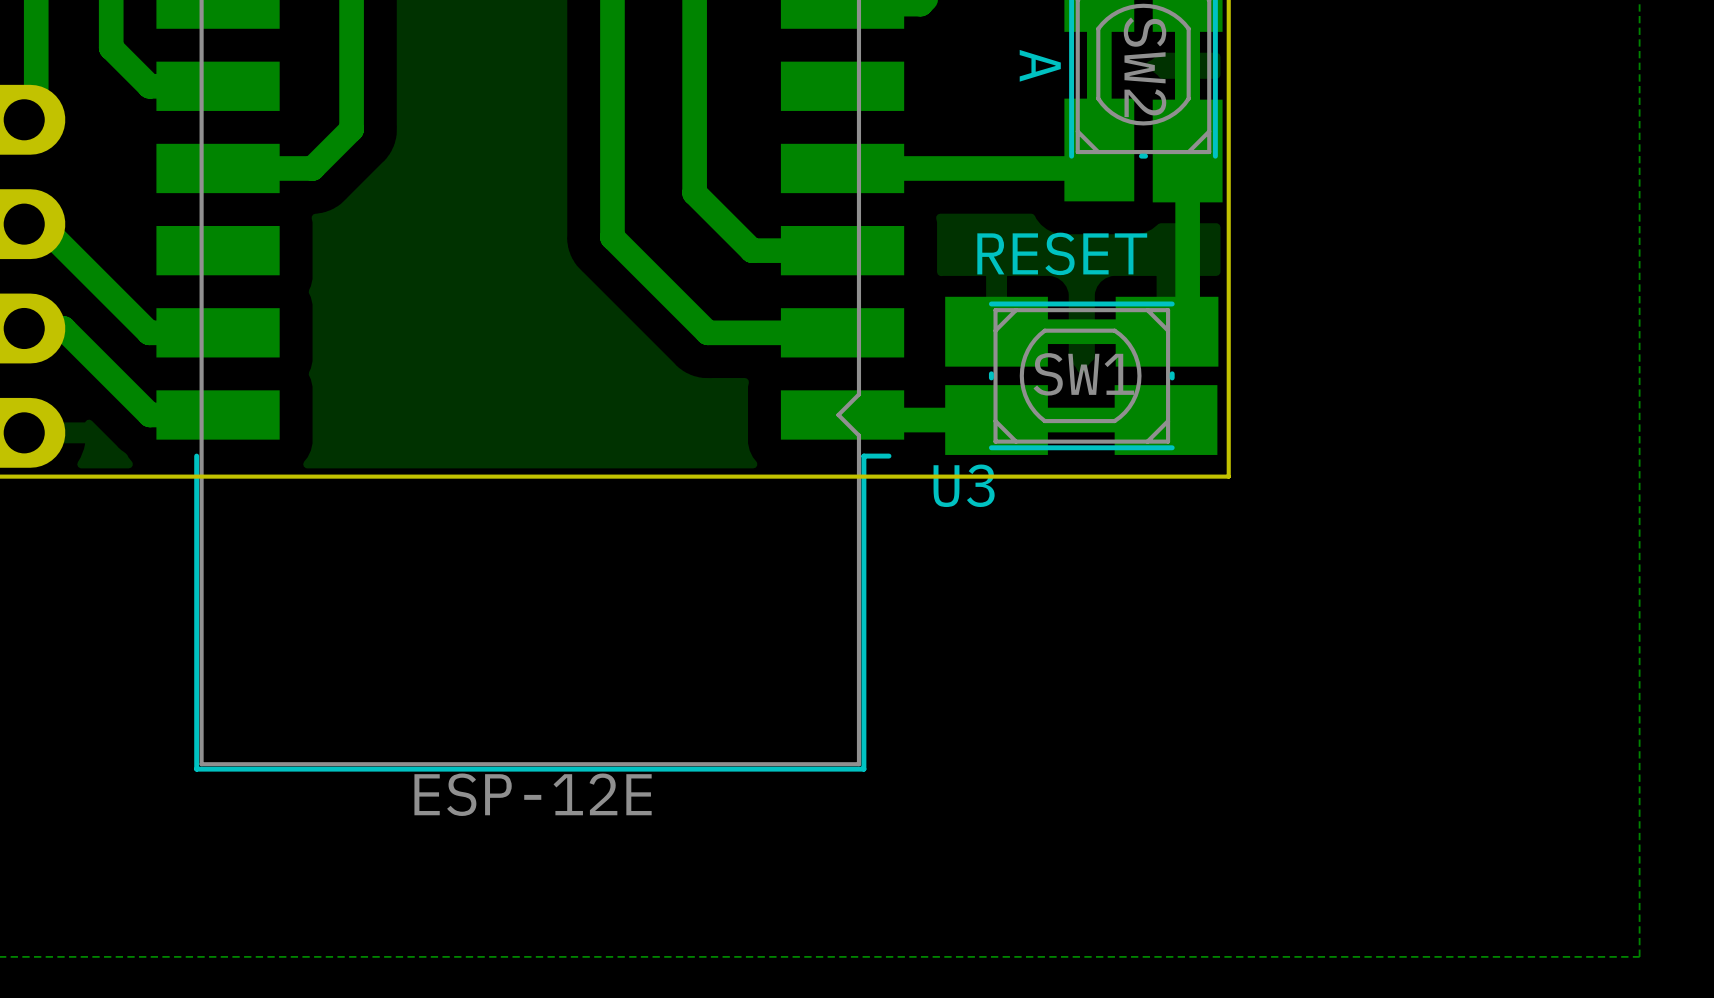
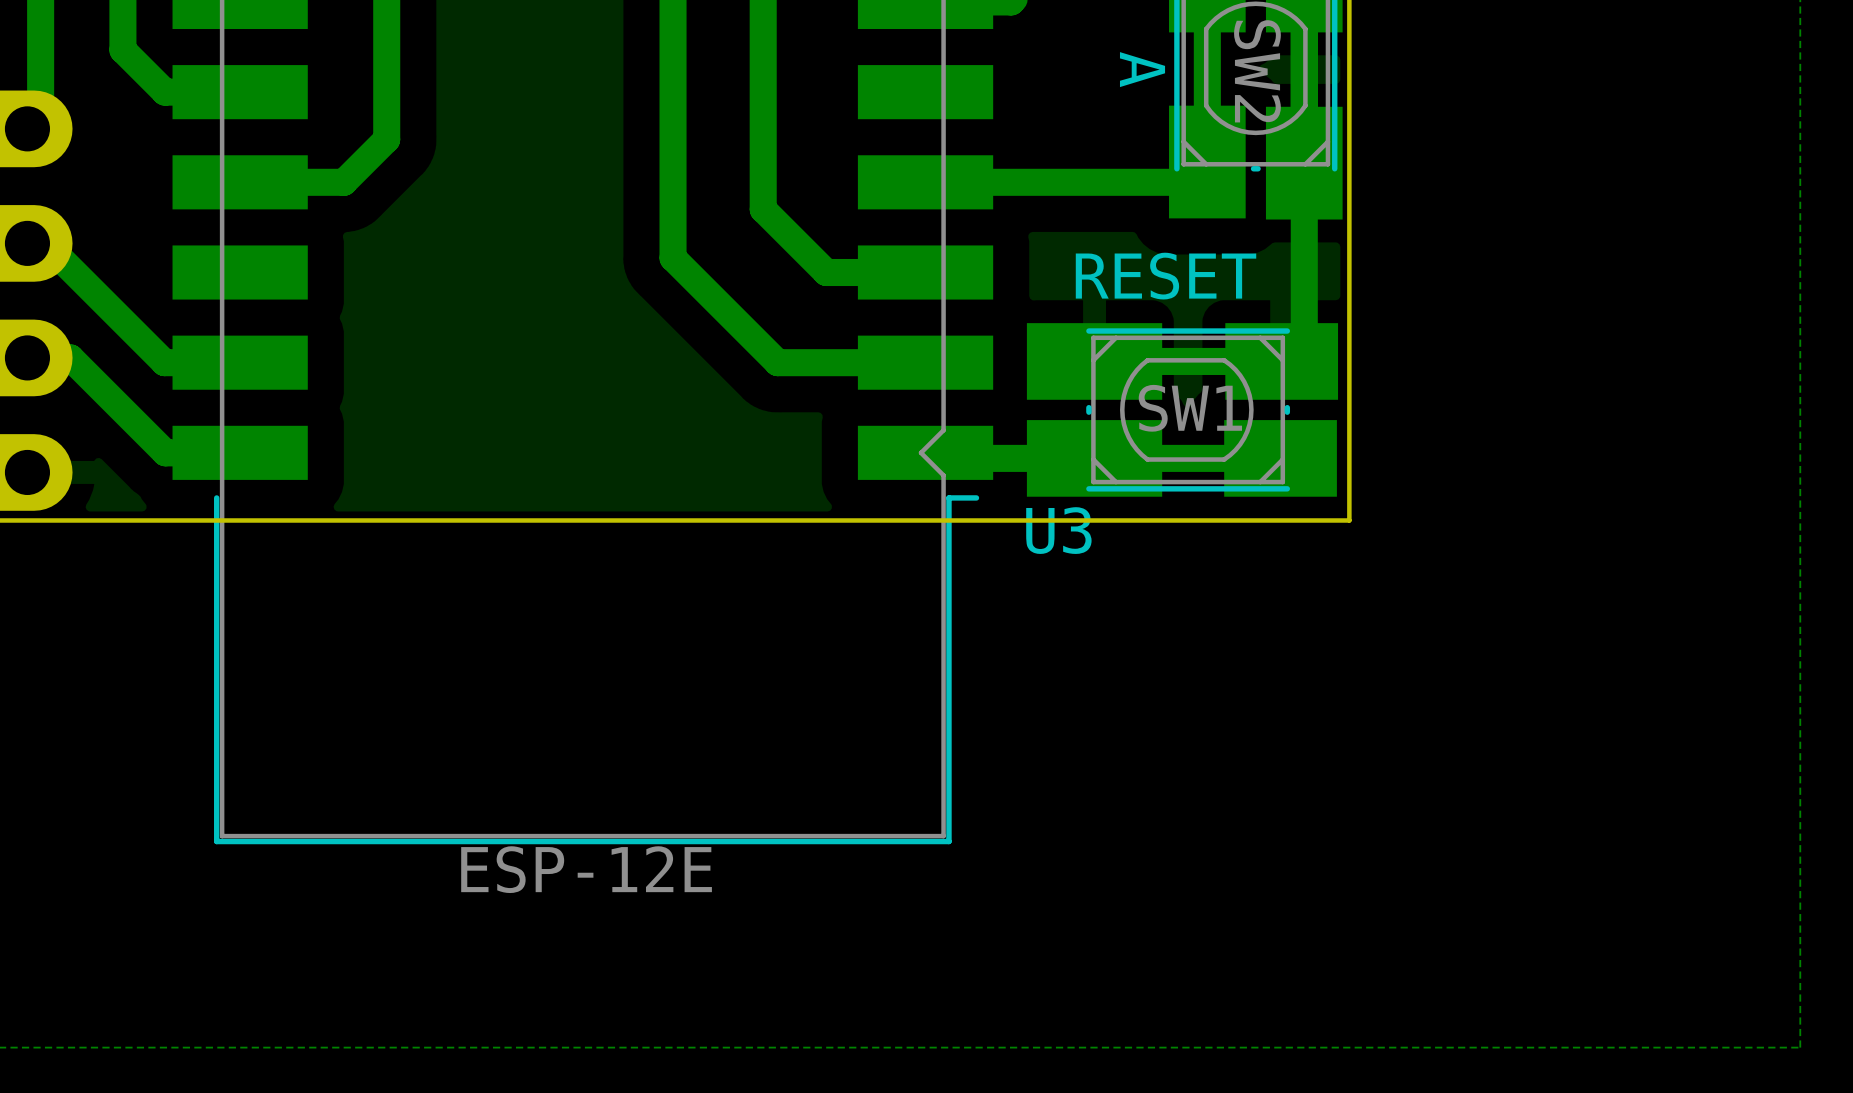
SW1 footprint: [945, 296, 1219, 455] -> [1026, 323, 1339, 497]

